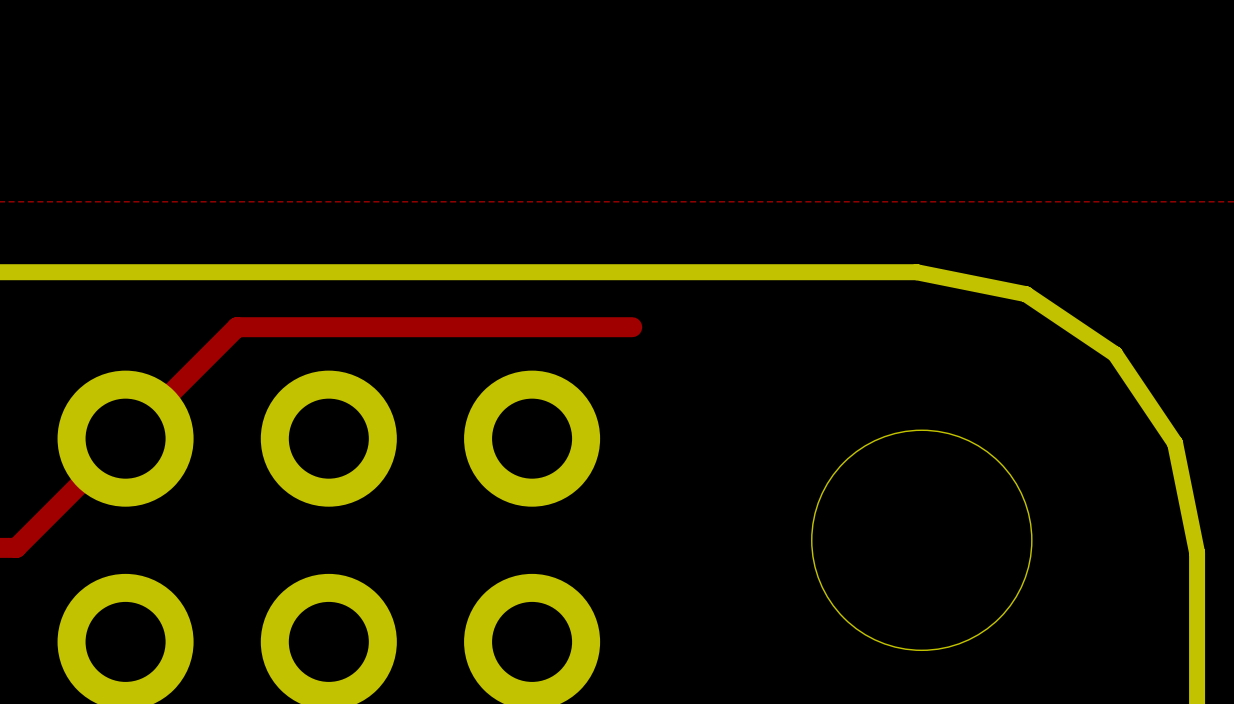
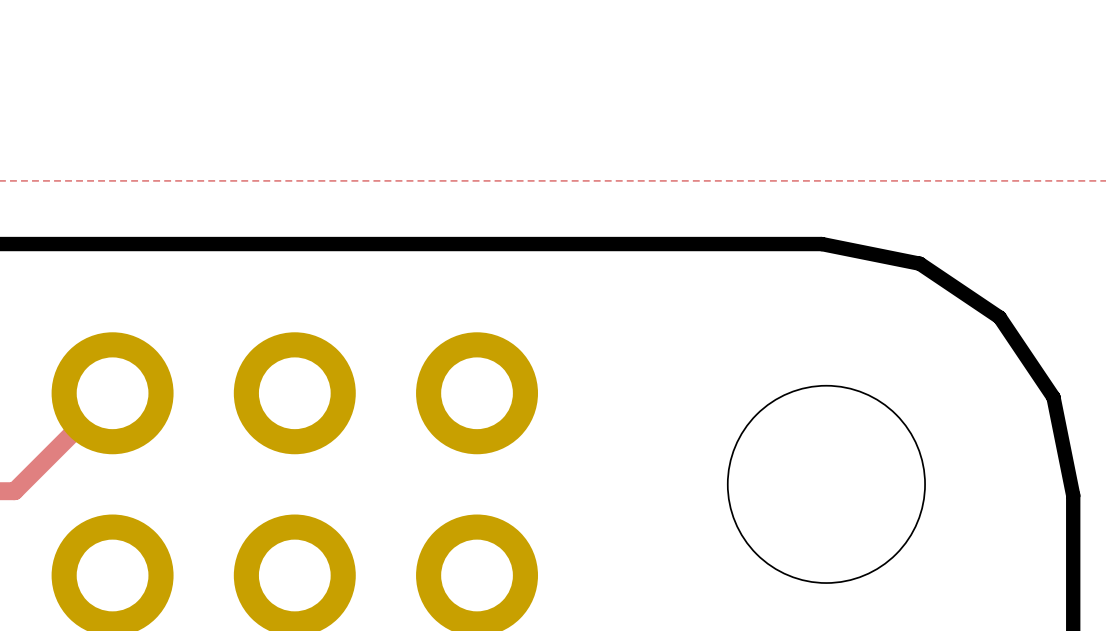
track: (632, 327) (237, 327) (125, 438) -> none

